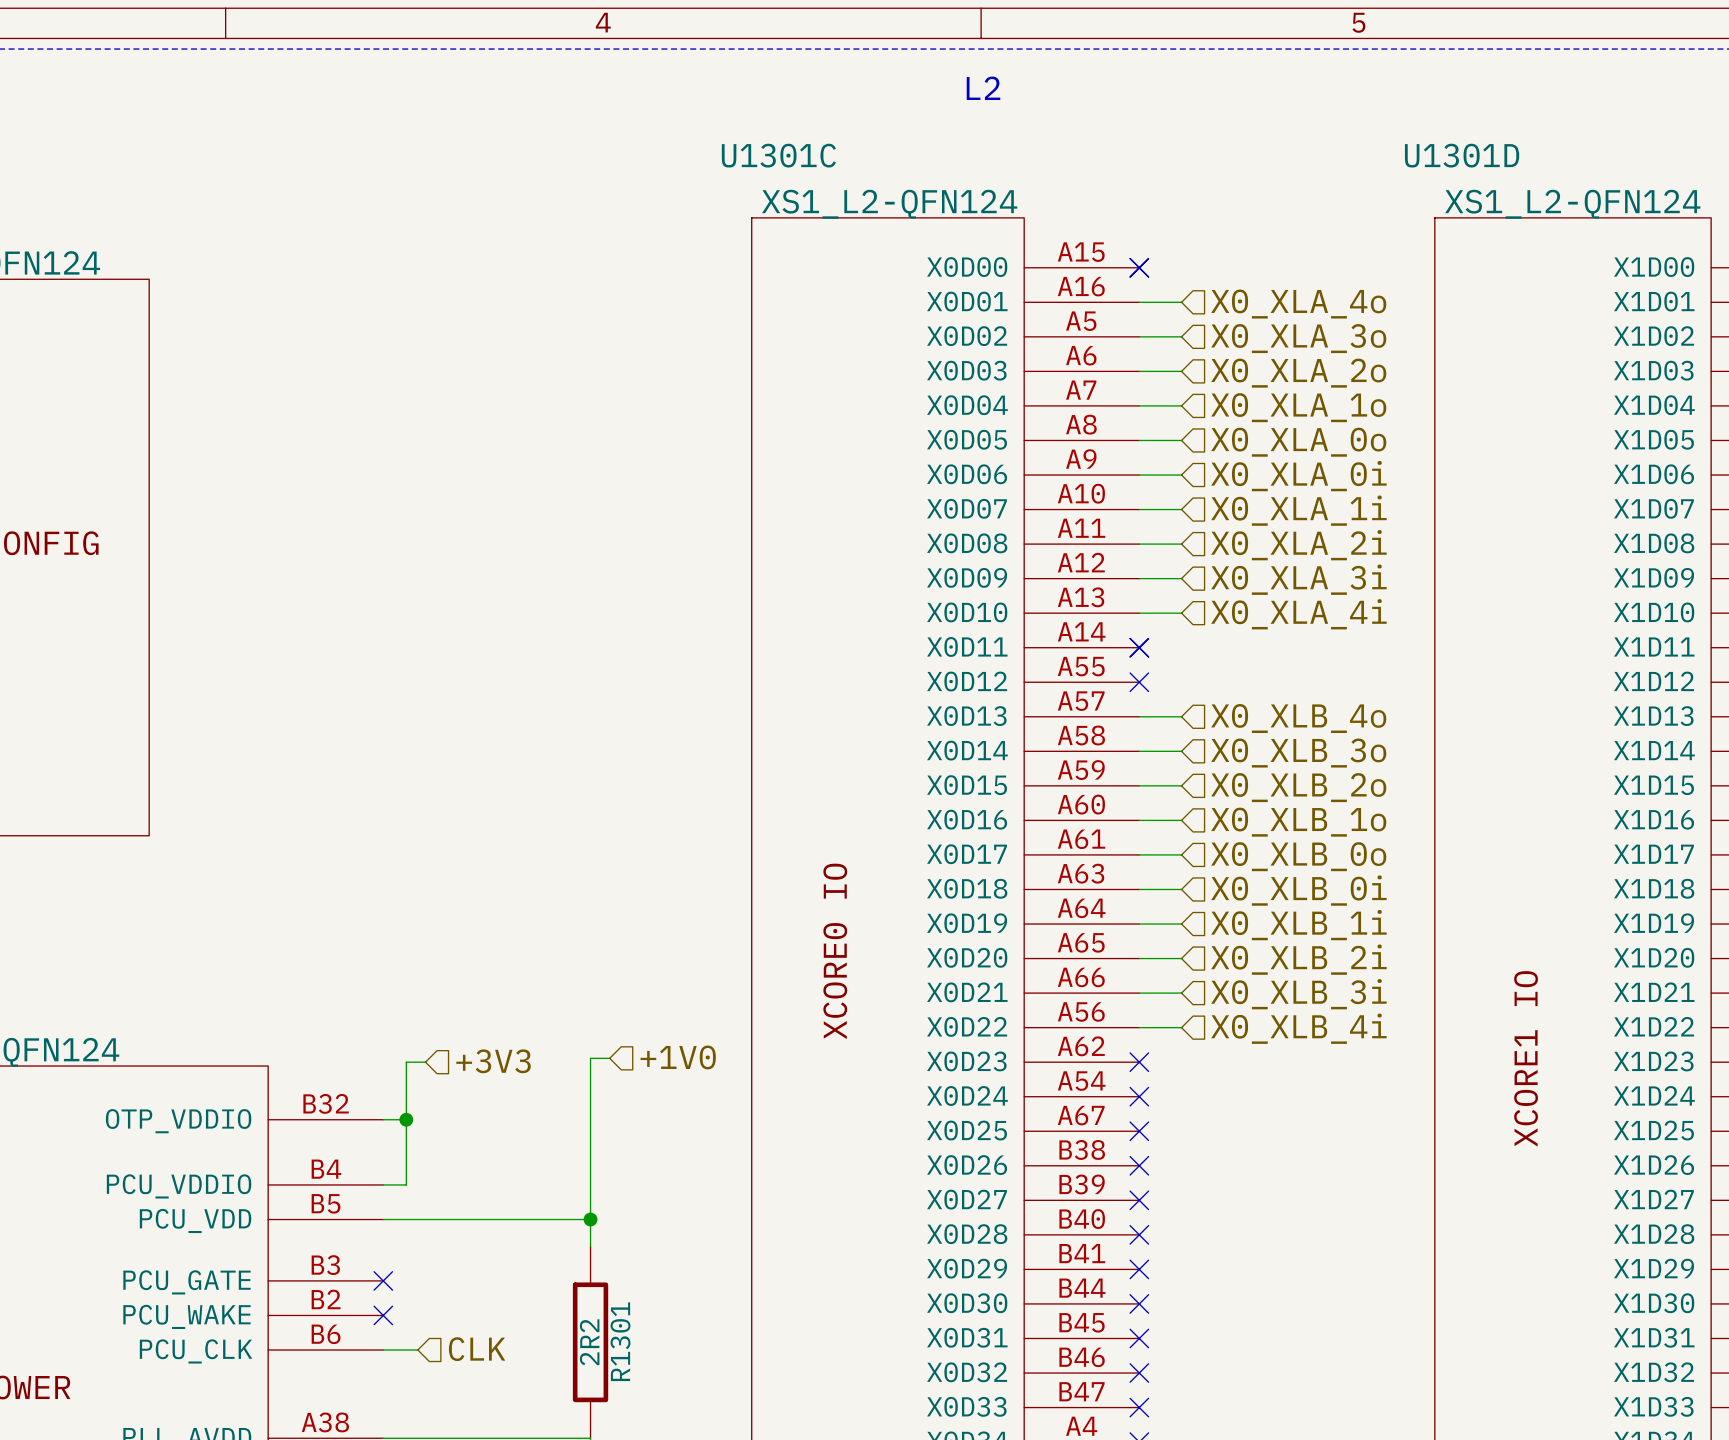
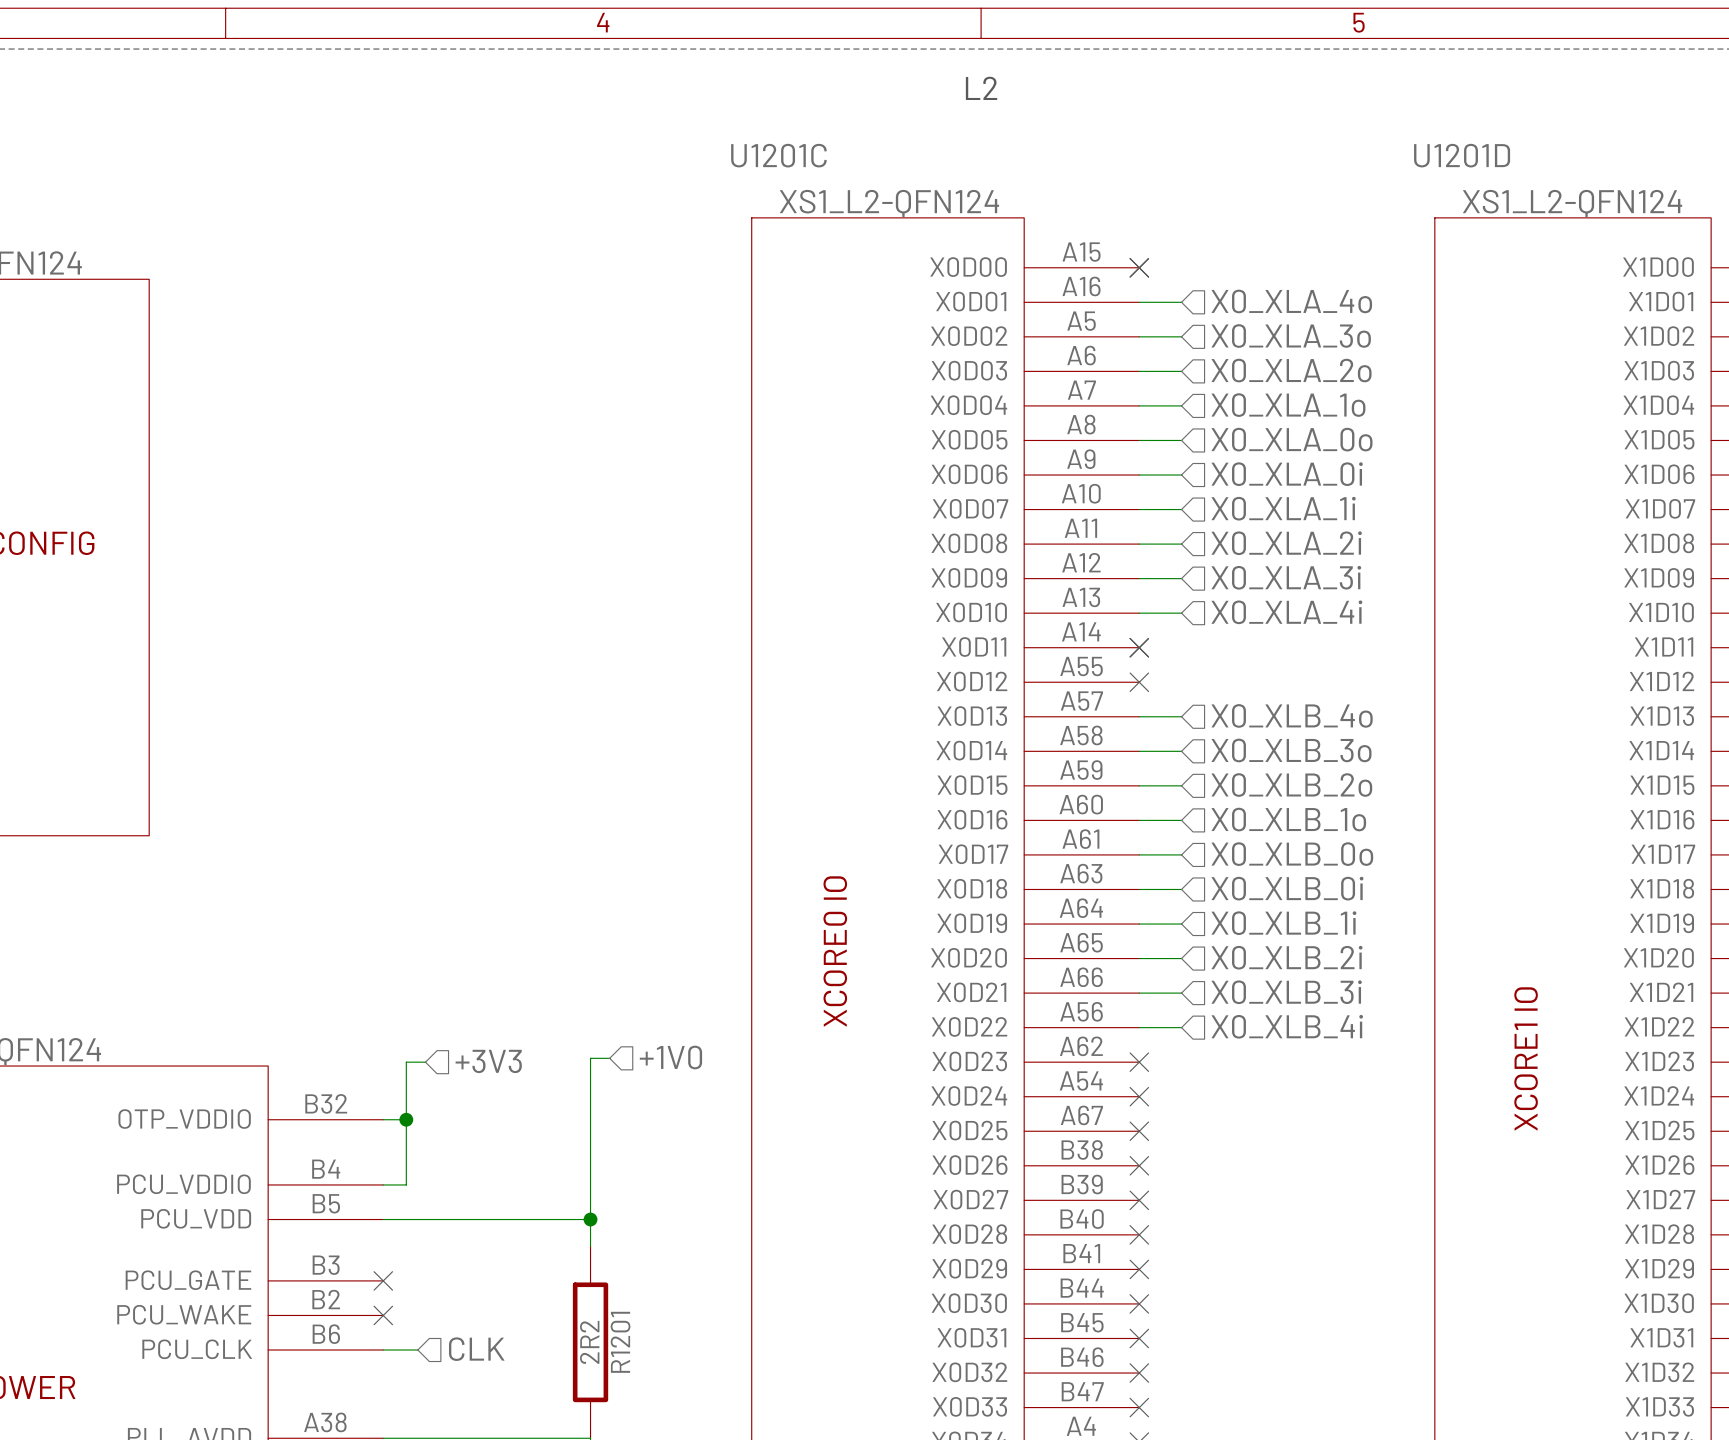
U1301C name: U1301C (778, 155) -> U1201C (778, 155)
U1301D name: U1301D (1462, 155) -> U1201D (1462, 155)
R1301 name: R1301 (620, 1341) -> R1201 (620, 1342)

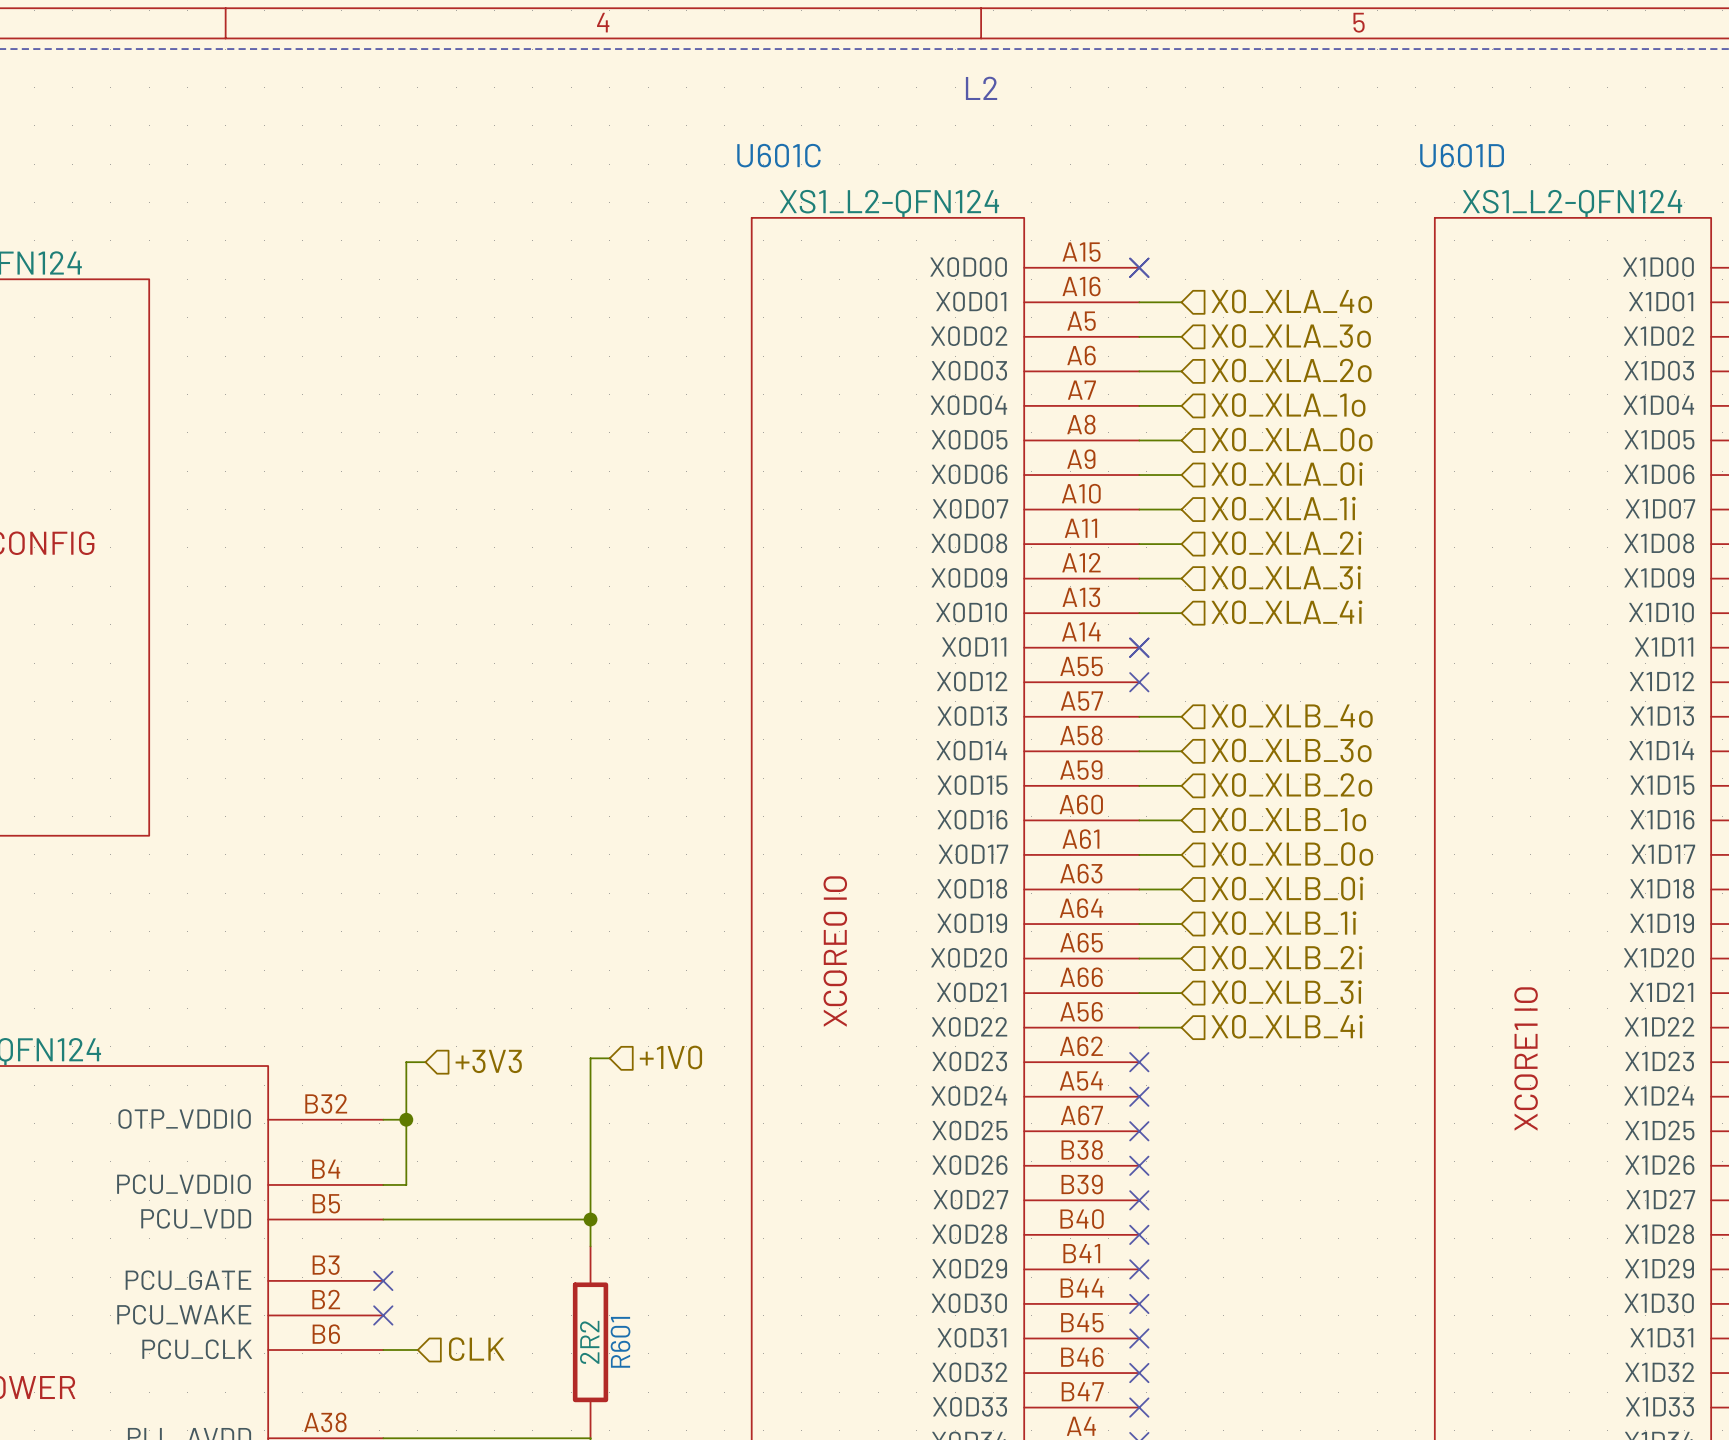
U1201C name: U1201C (778, 155) -> U601C (778, 155)
U1201D name: U1201D (1462, 155) -> U601D (1462, 155)
R1201 name: R1201 (620, 1342) -> R601 (620, 1342)

